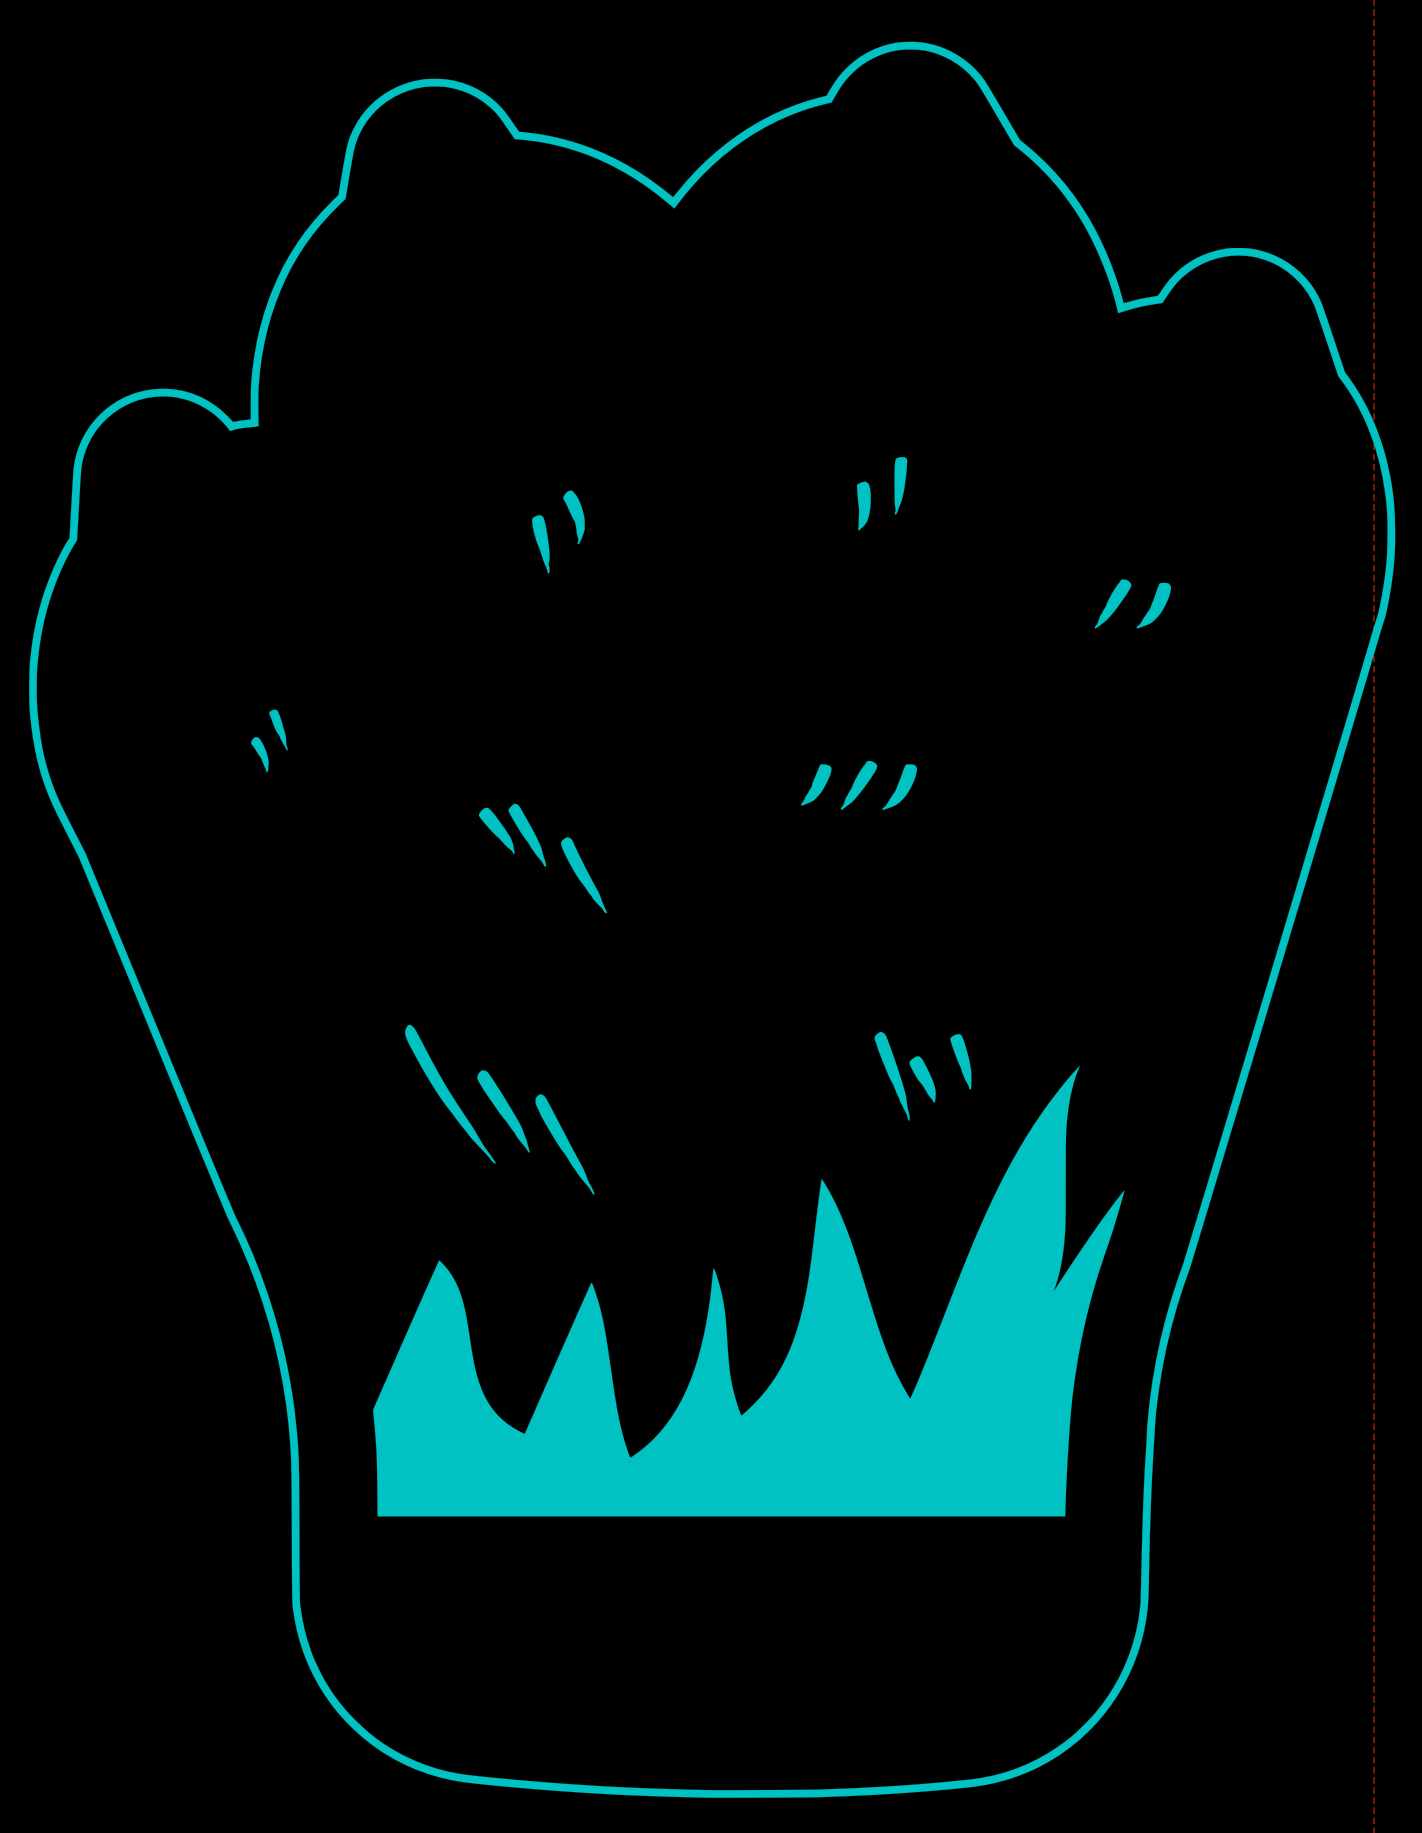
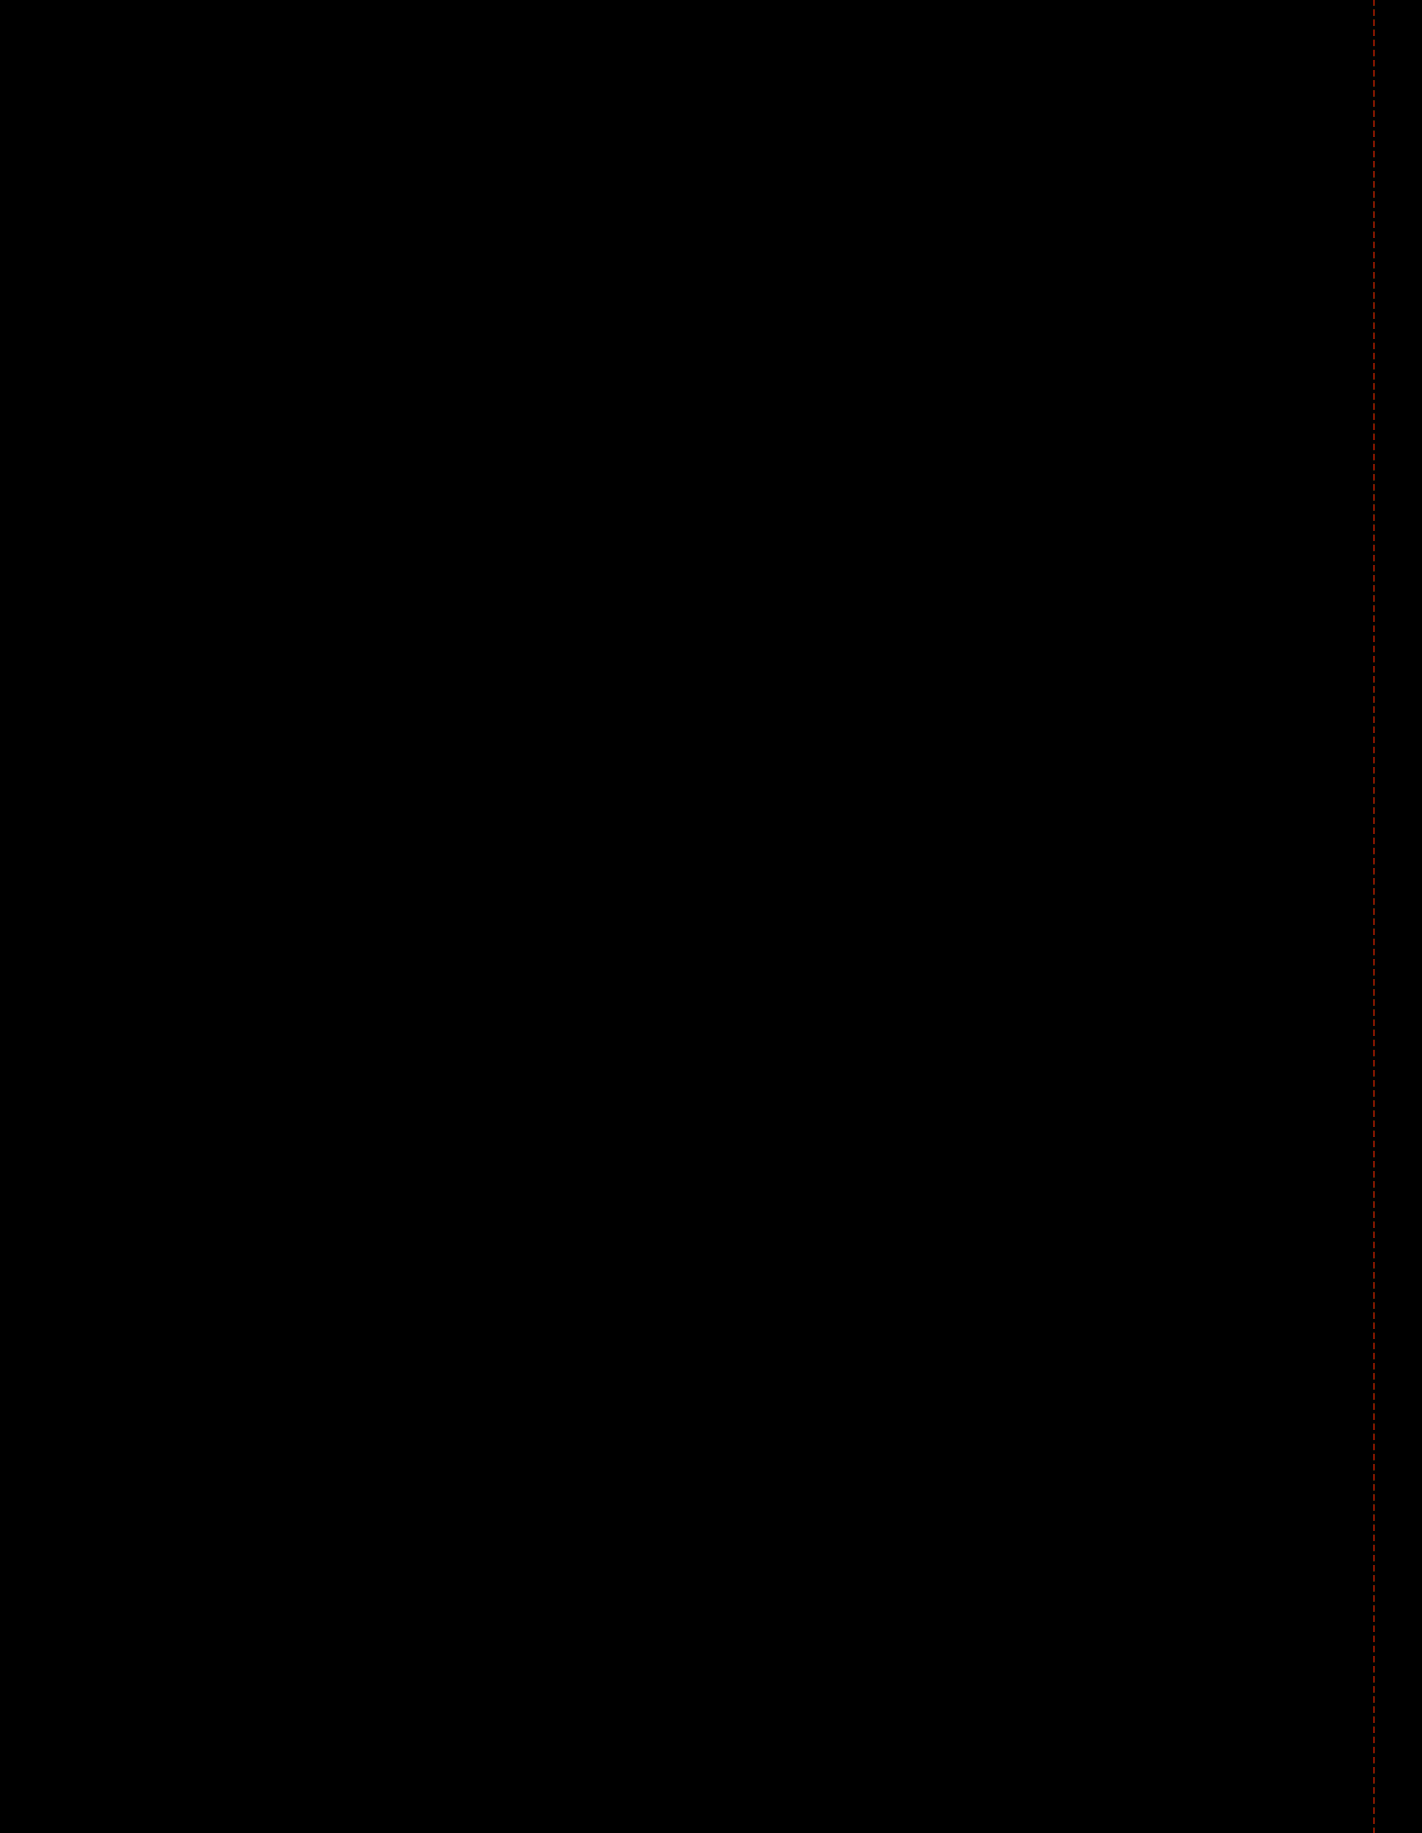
drawing: [29, 41, 1396, 1798] -> none

